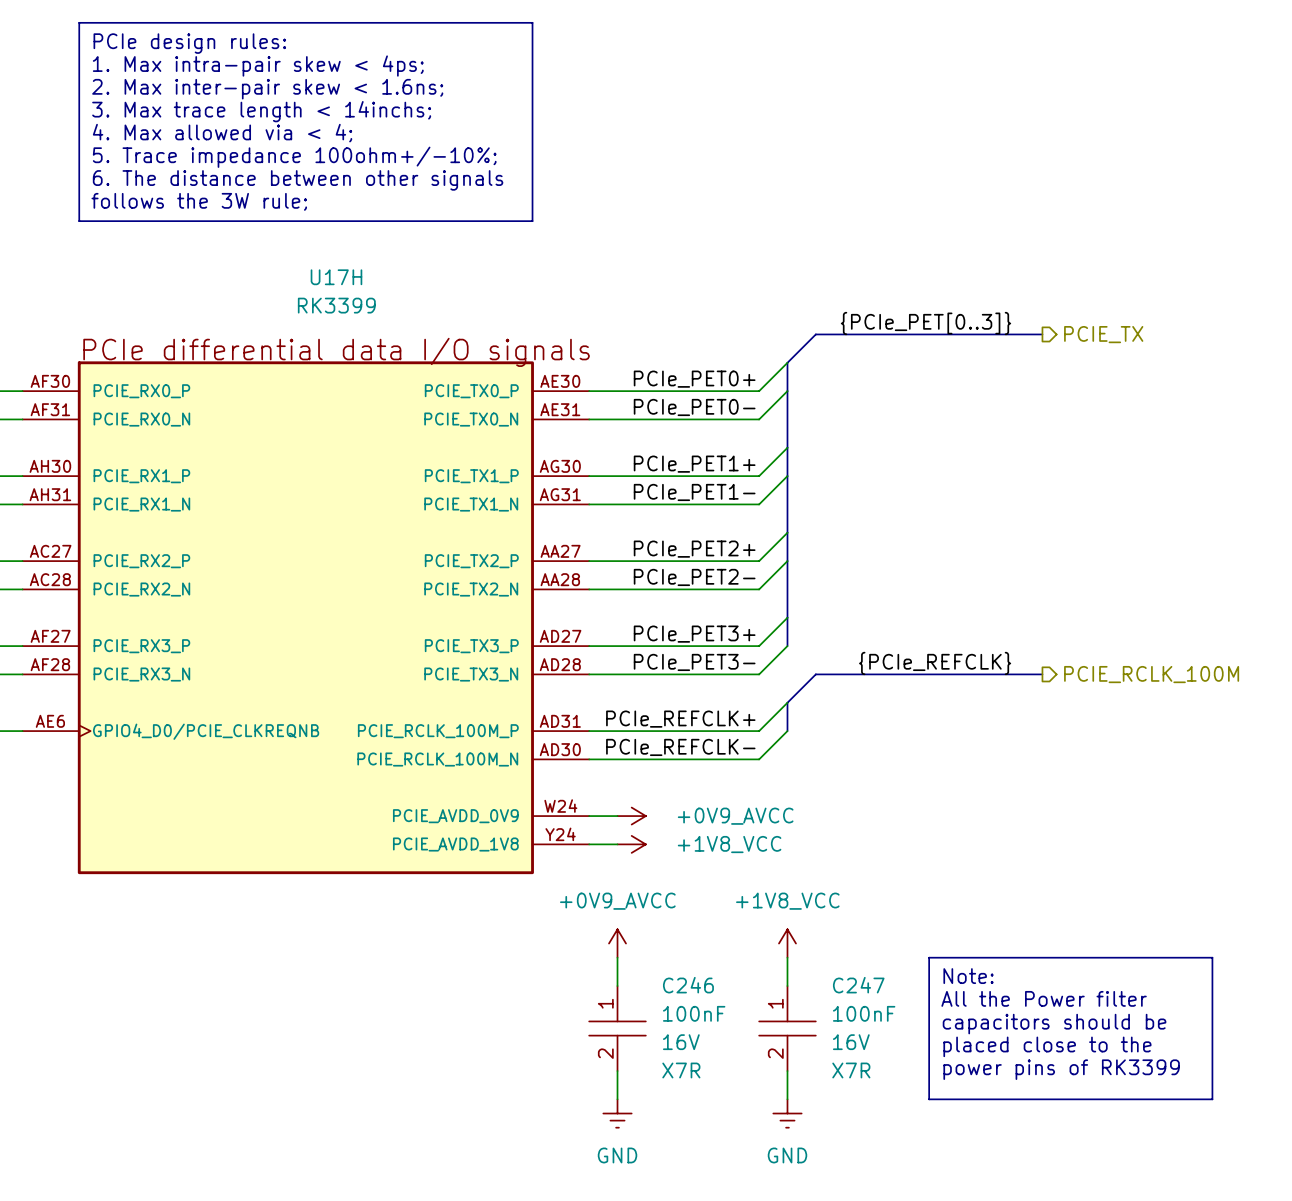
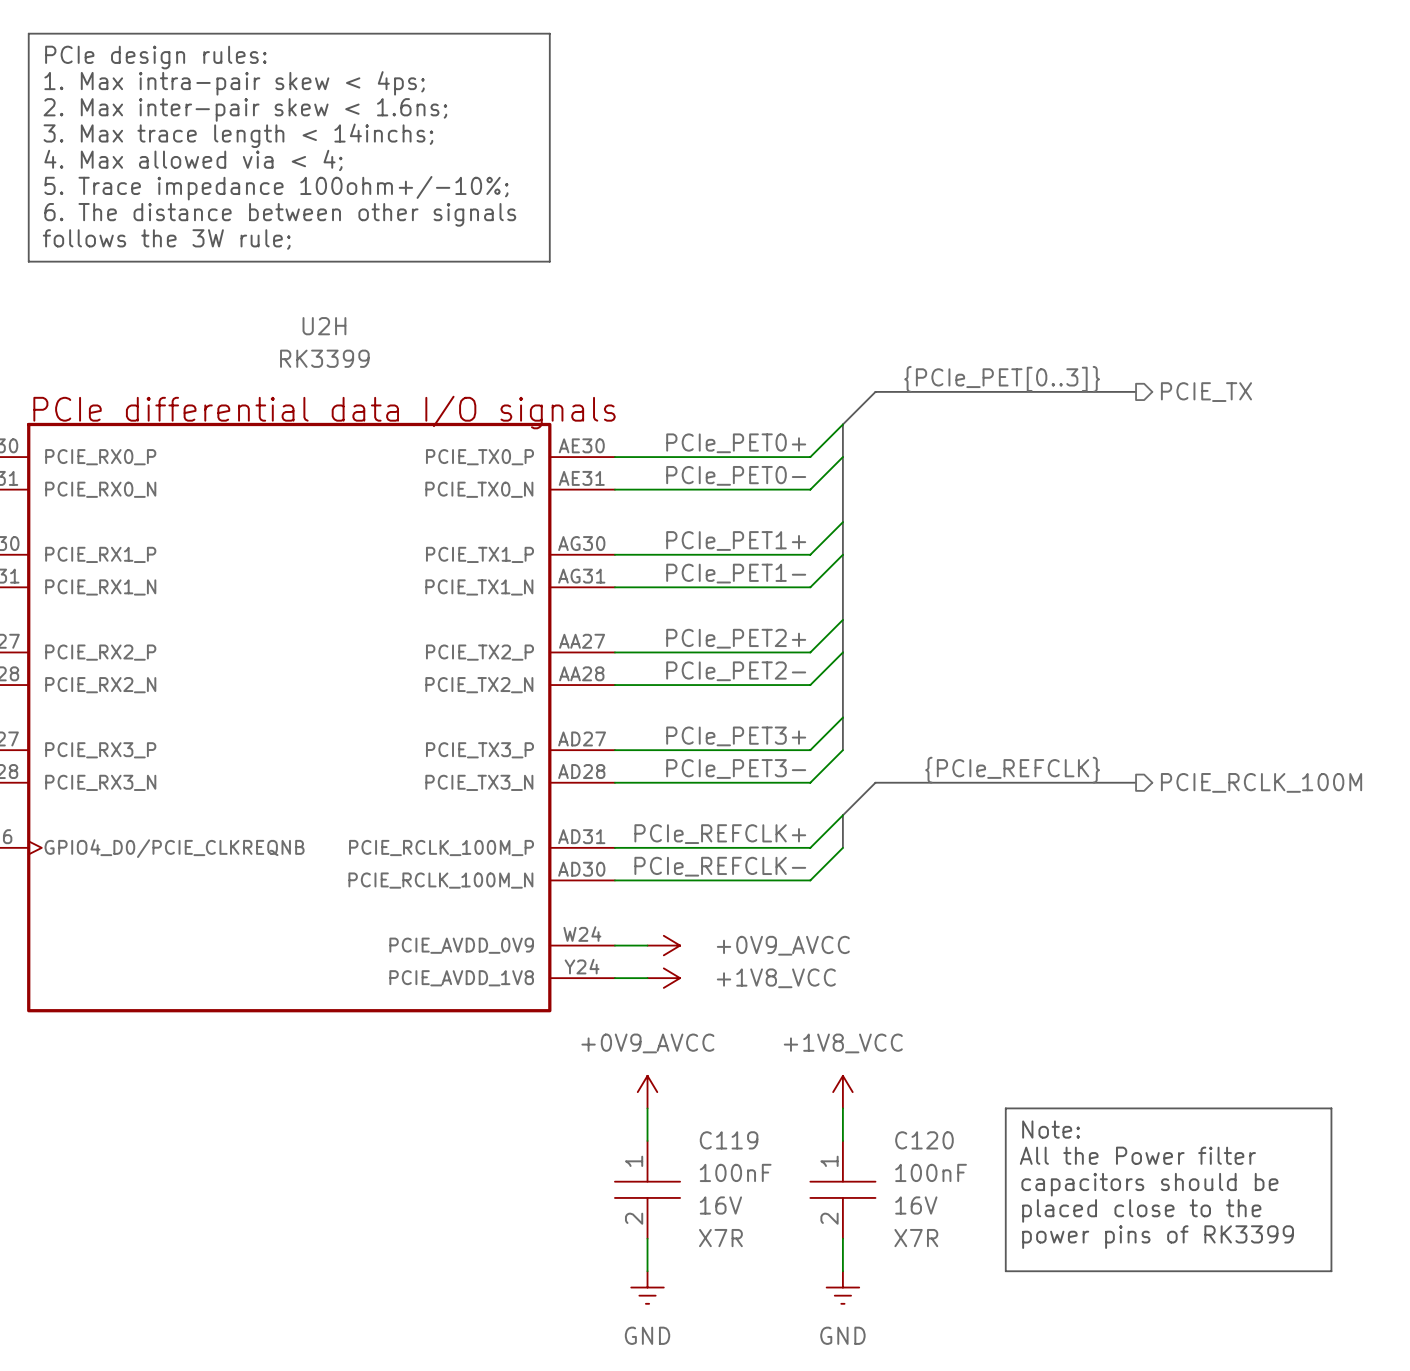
U17H name: U17H (336, 277) -> U2H (324, 326)
C246 name: C246 (688, 985) -> C119 (729, 1140)
C247 name: C247 (858, 985) -> C120 (924, 1140)

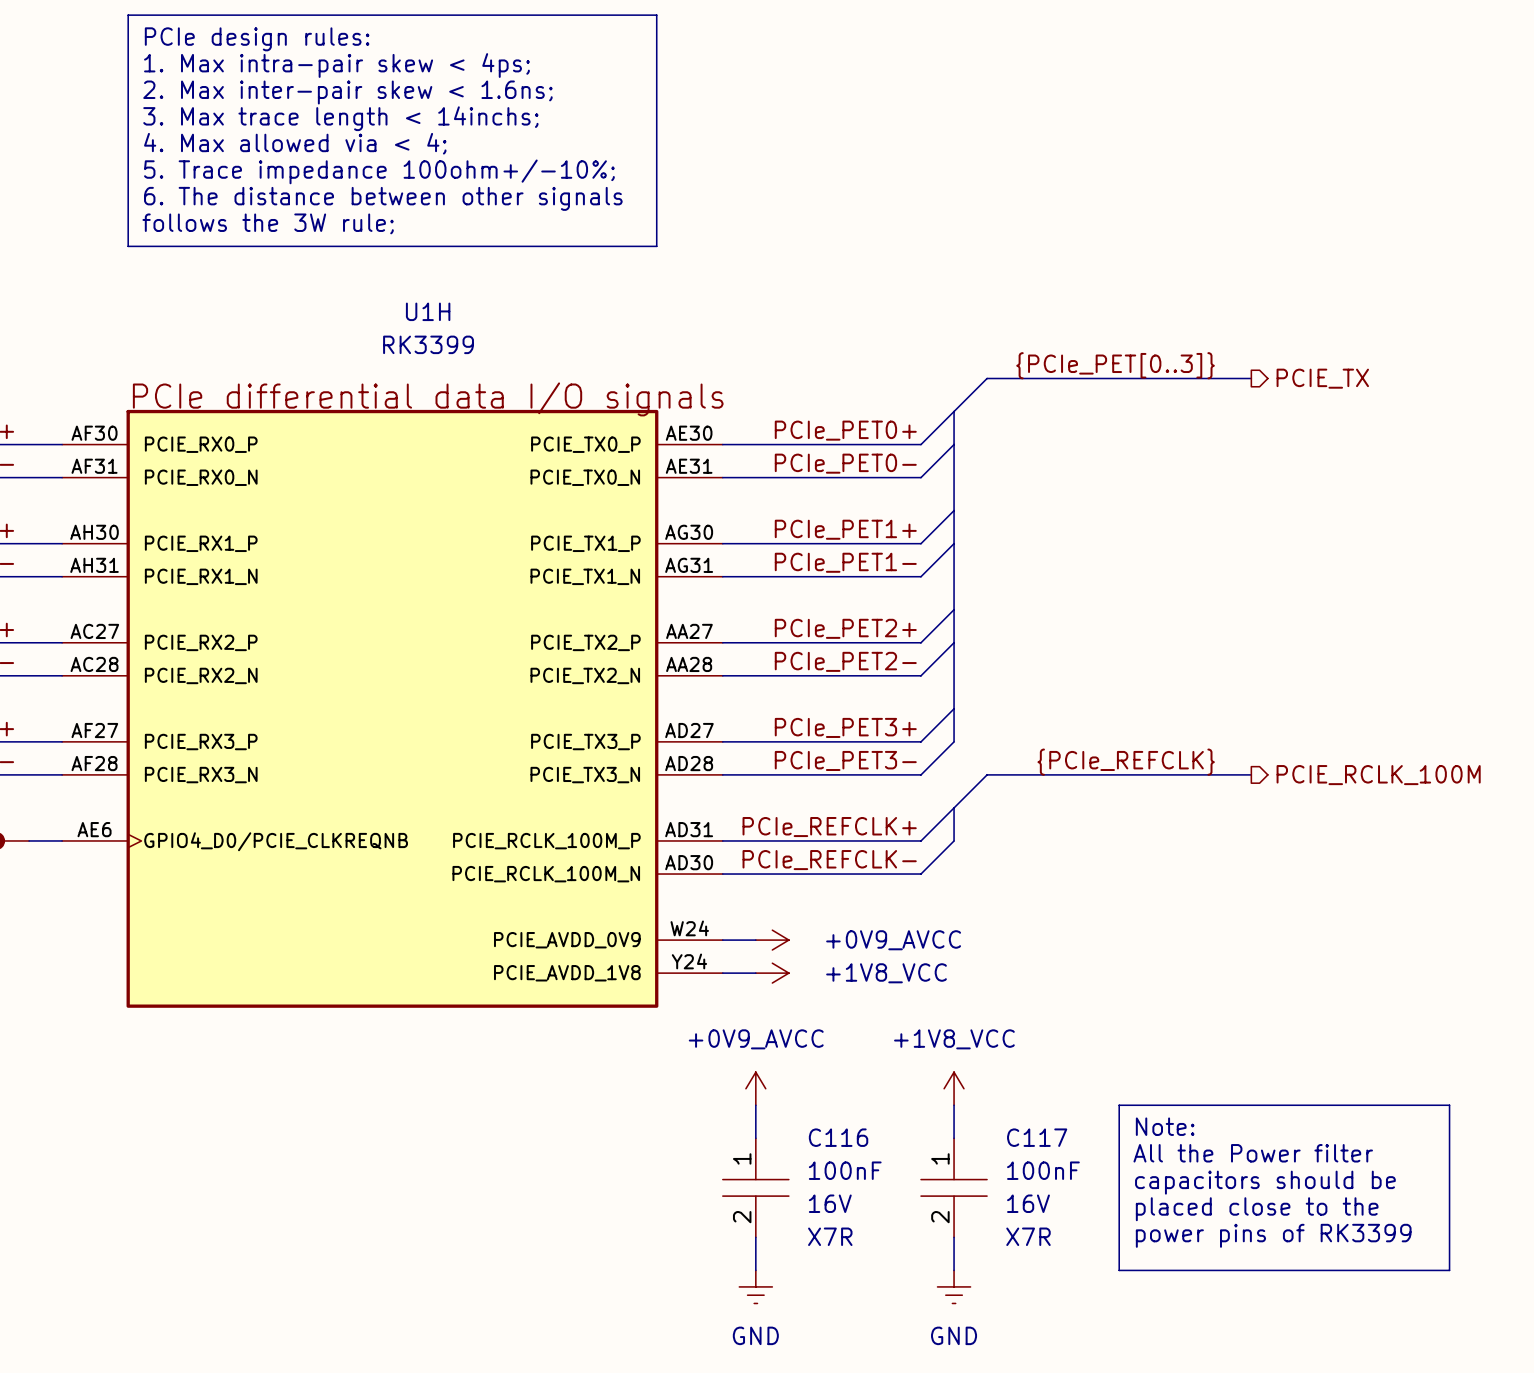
U2H name: U2H (324, 326) -> U1H (428, 311)
C119 name: C119 (729, 1140) -> C116 (838, 1137)
C120 name: C120 (924, 1140) -> C117 (1037, 1137)

